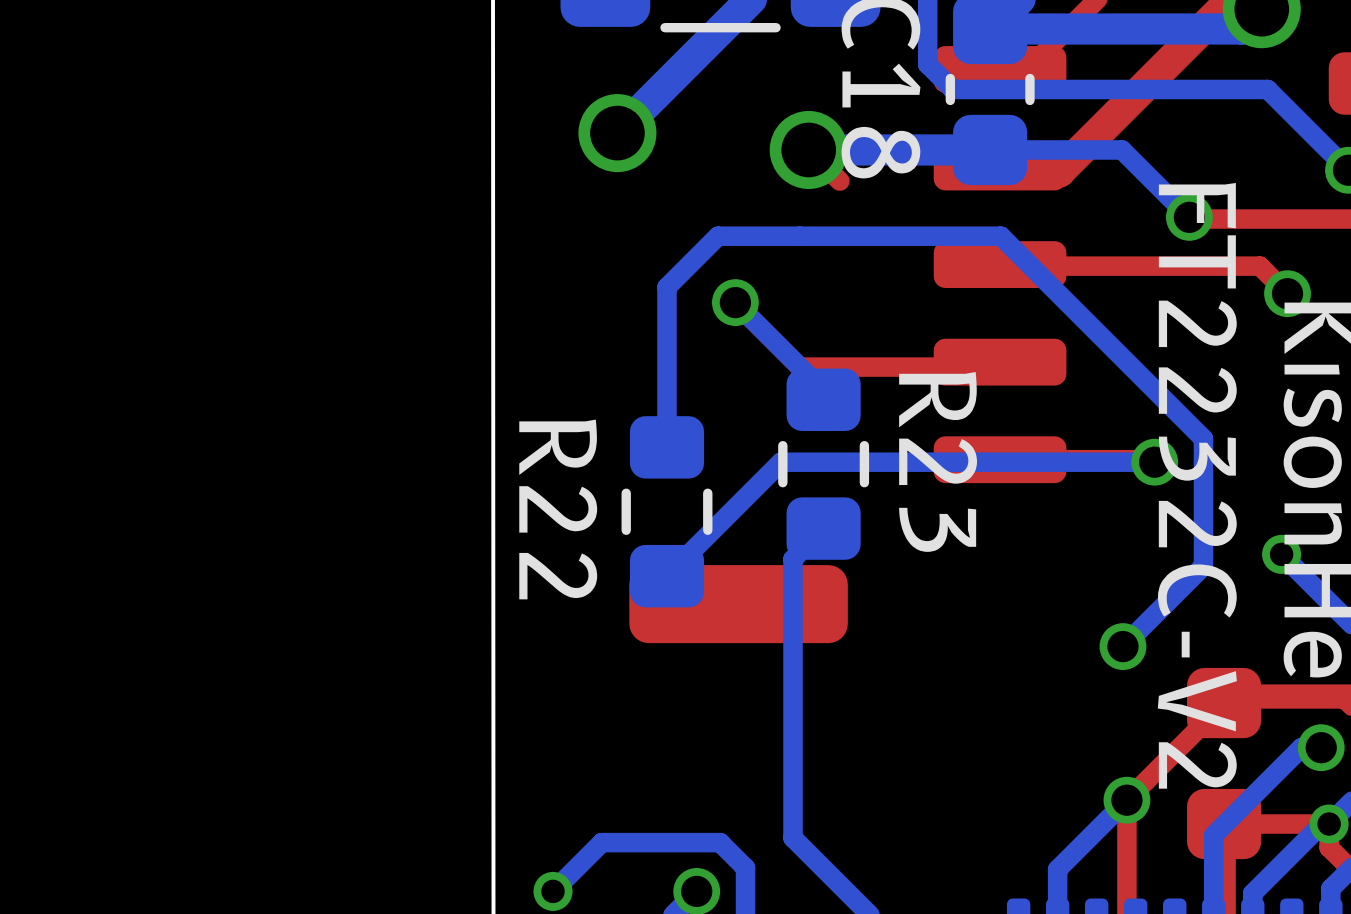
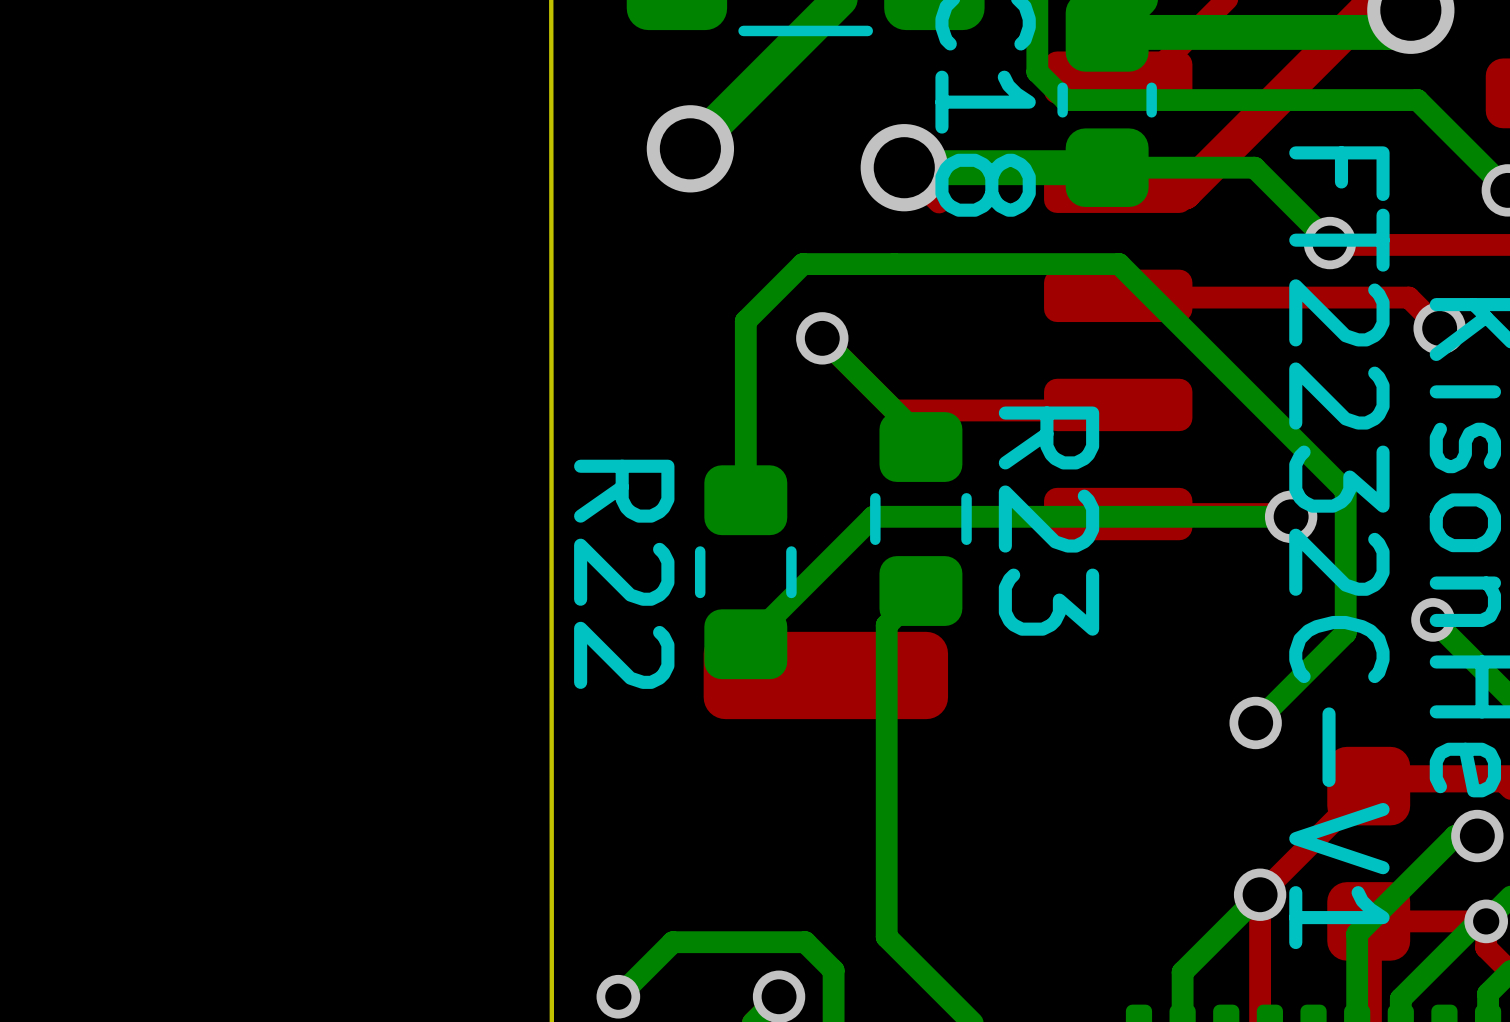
text: FT2232C-V2 (1197, 485) -> FT2232C-V1 (1339, 547)

